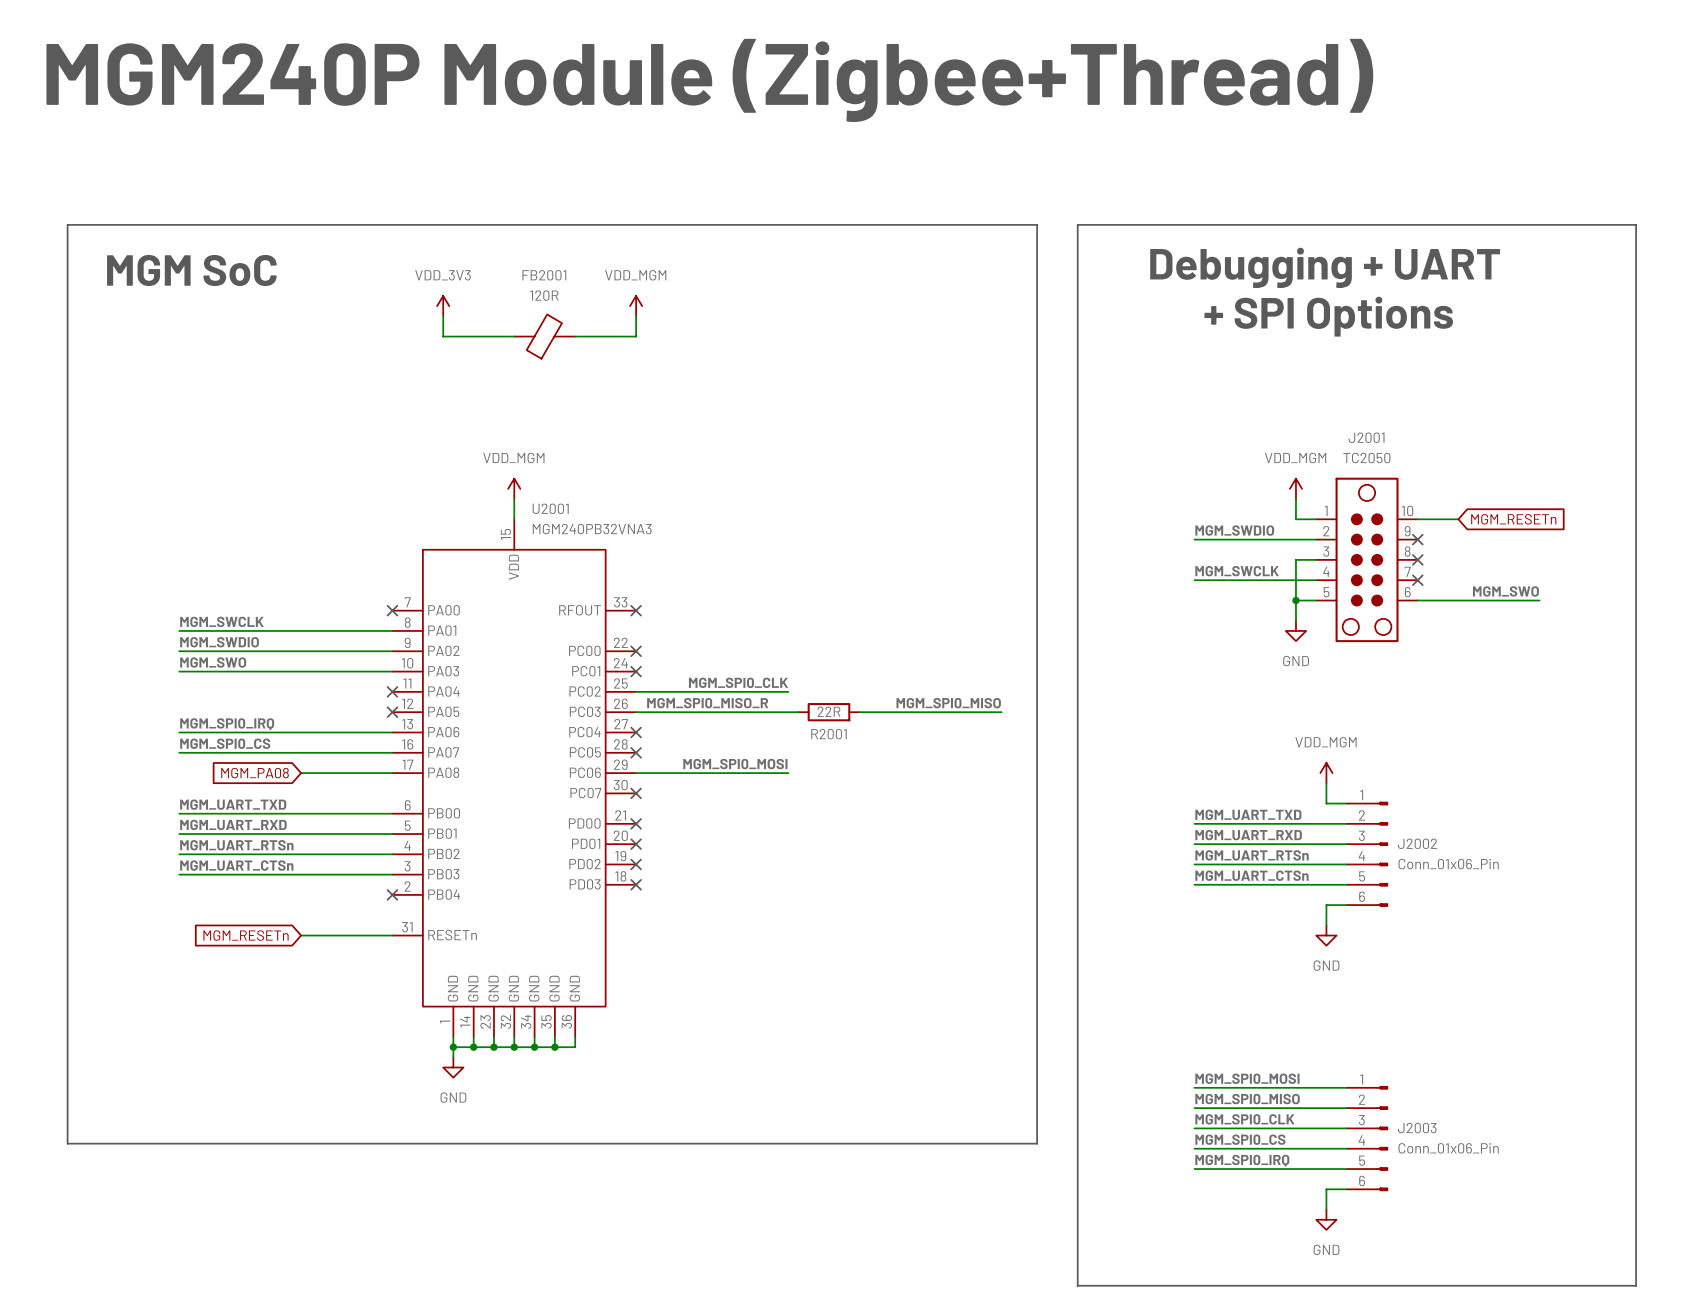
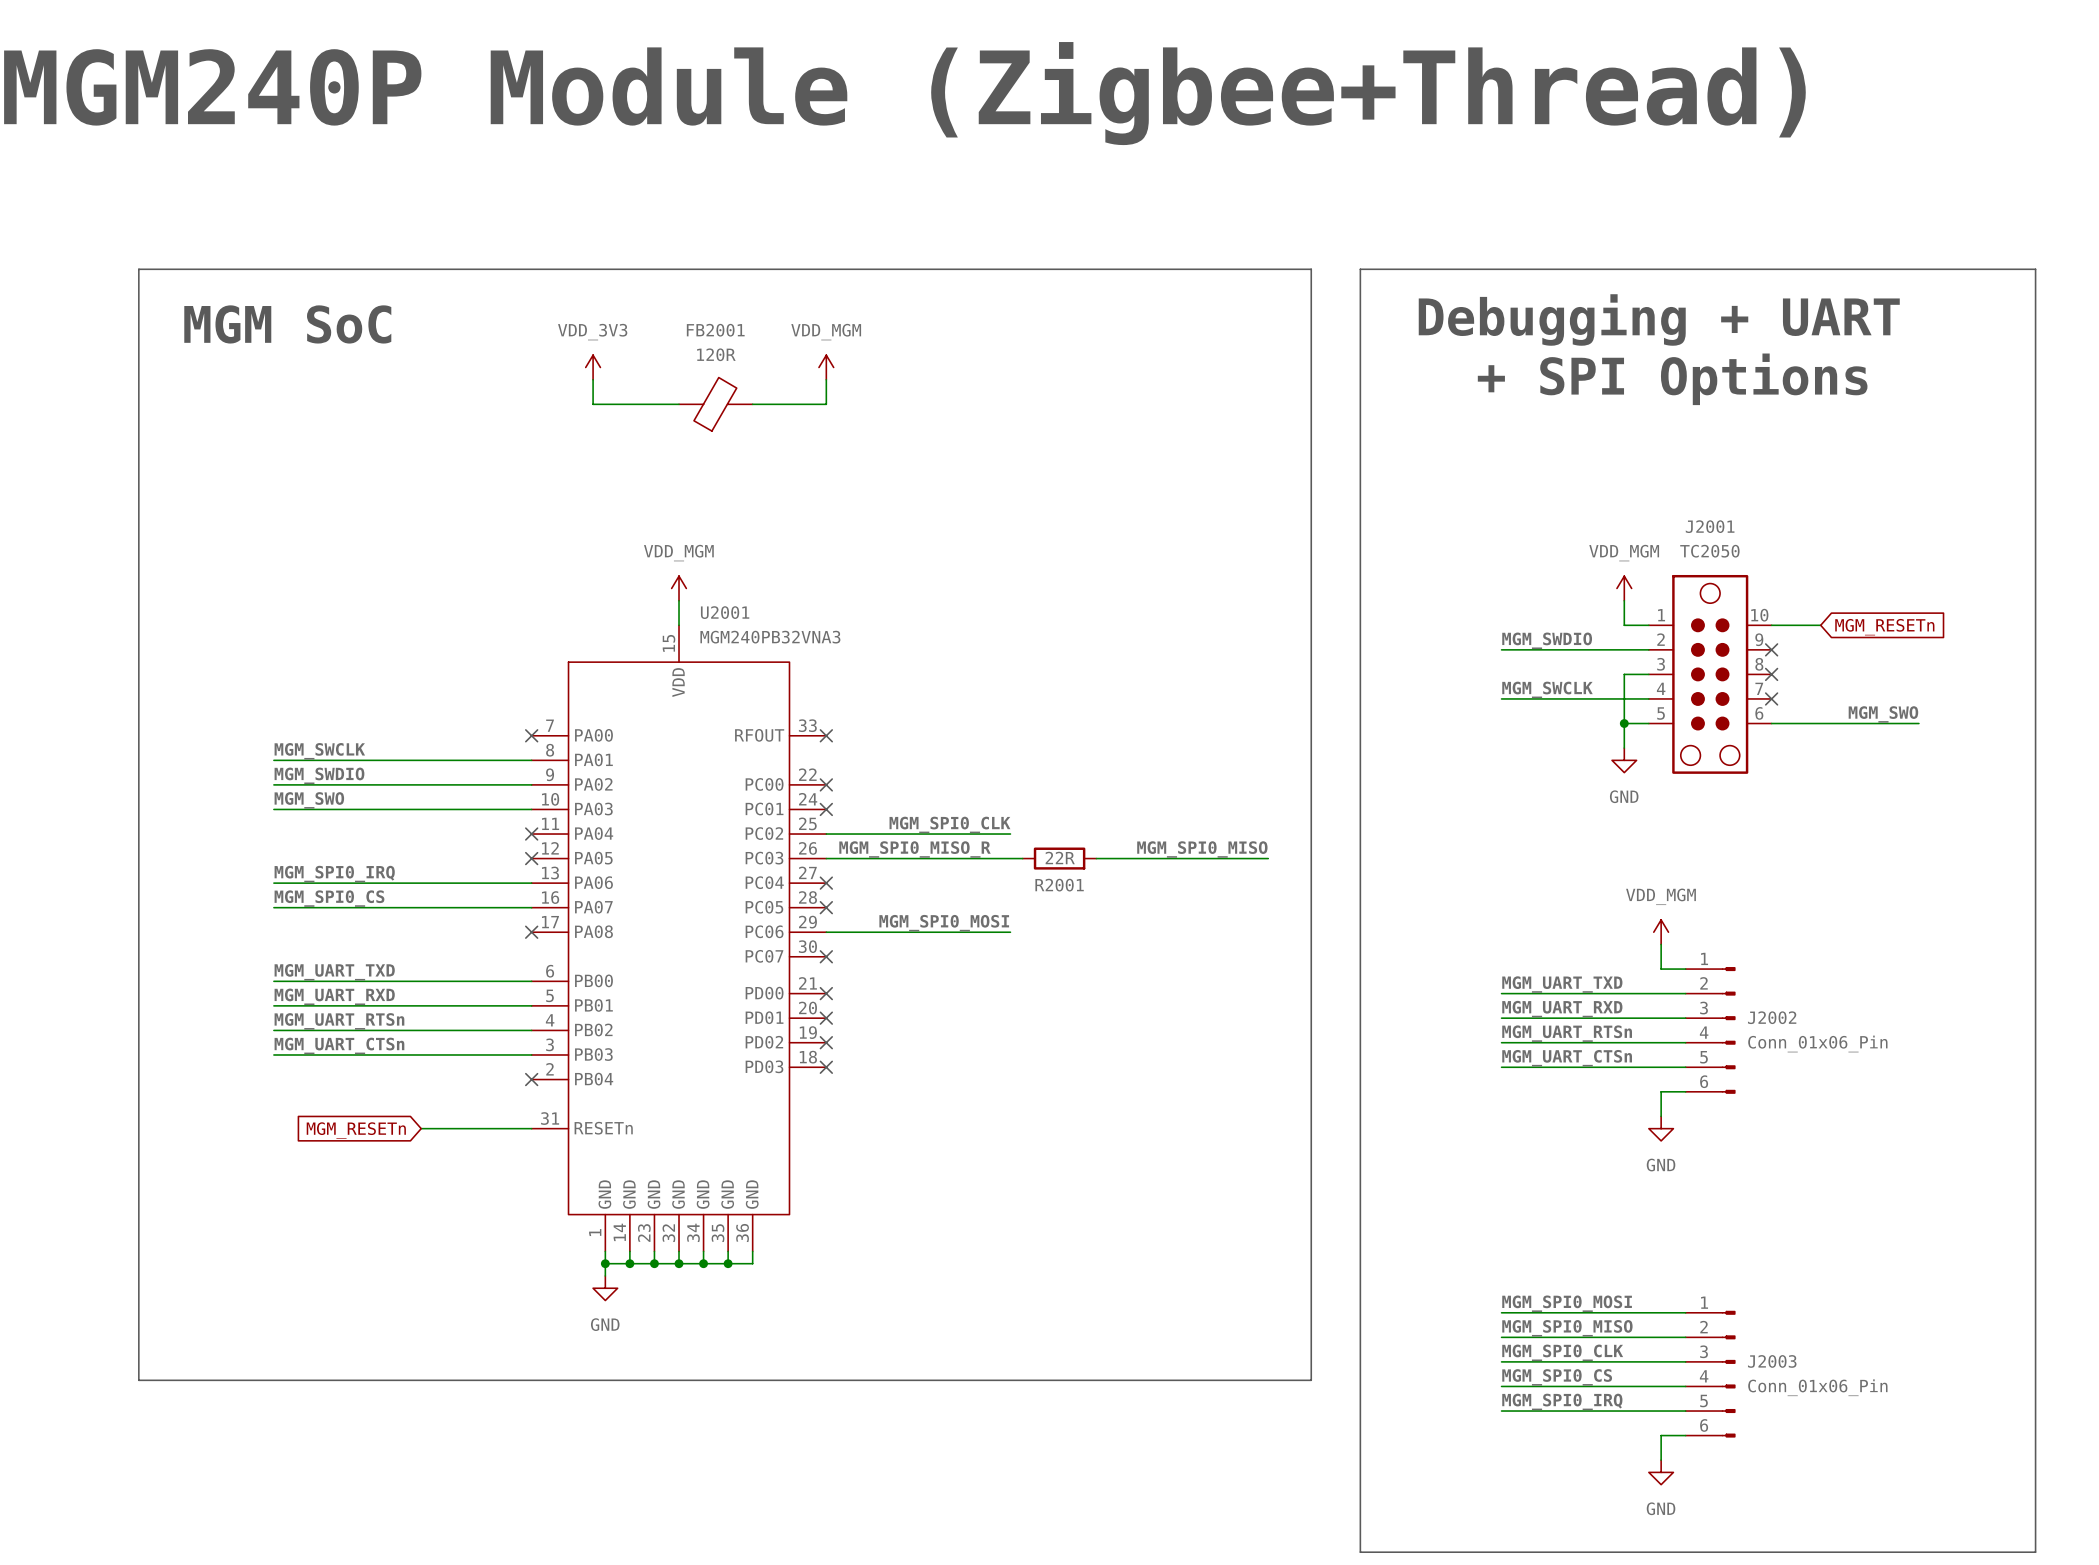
global label: MGM_PA08 (255, 773) -> none
wire: (301, 773) (392, 773) -> none
no-connect mark: none -> (531, 932)

